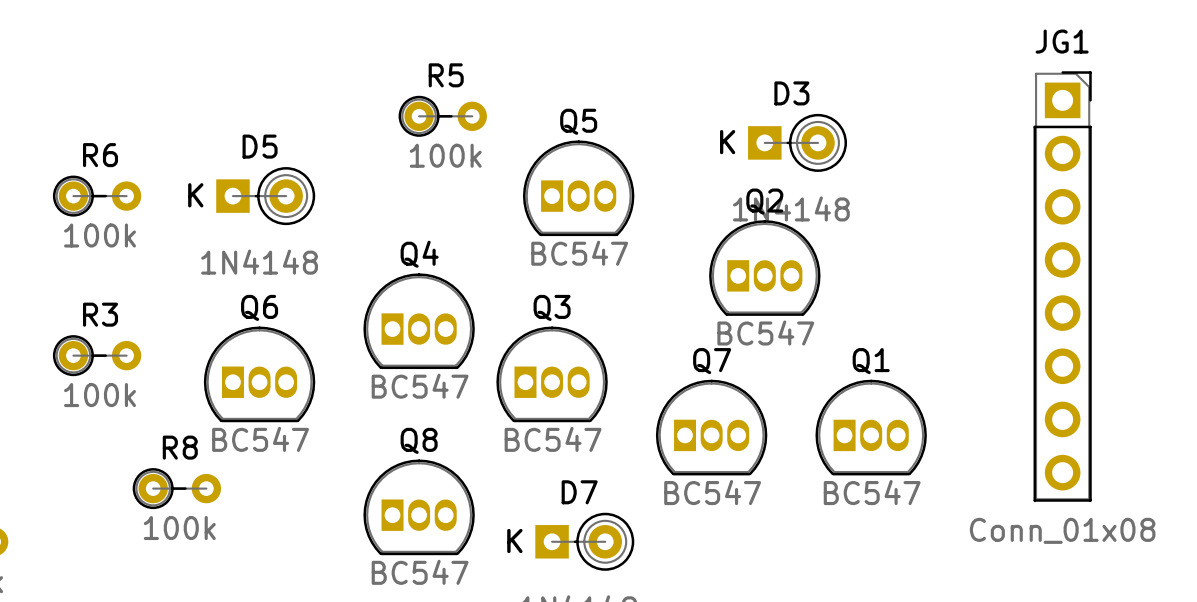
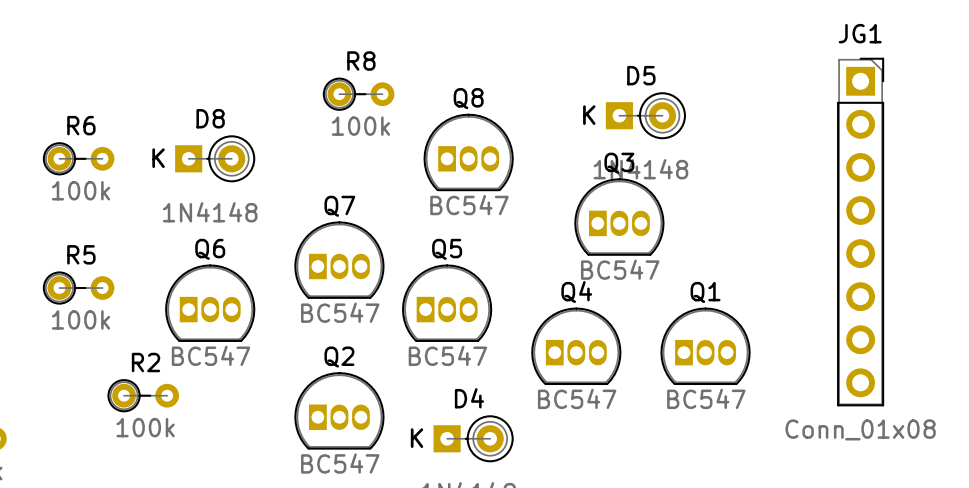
R5 name: R5 (446, 75) -> R8 (361, 61)
D3 name: D3 (791, 93) -> D5 (641, 75)
Q5 name: Q5 (578, 121) -> Q8 (468, 98)
D5 name: D5 (260, 146) -> D8 (210, 118)
Q2 name: Q2 (764, 201) -> Q3 (619, 163)
Q4 name: Q4 (419, 254) -> Q7 (339, 206)
Q3 name: Q3 (552, 307) -> Q5 (447, 249)
R3 name: R3 (100, 314) -> R5 (81, 254)
Q7 name: Q7 (712, 361) -> Q4 (576, 292)
Q8 name: Q8 (419, 440) -> Q2 (339, 357)
R8 name: R8 (180, 447) -> R2 (146, 362)
D7 name: D7 (579, 492) -> D4 (469, 398)

